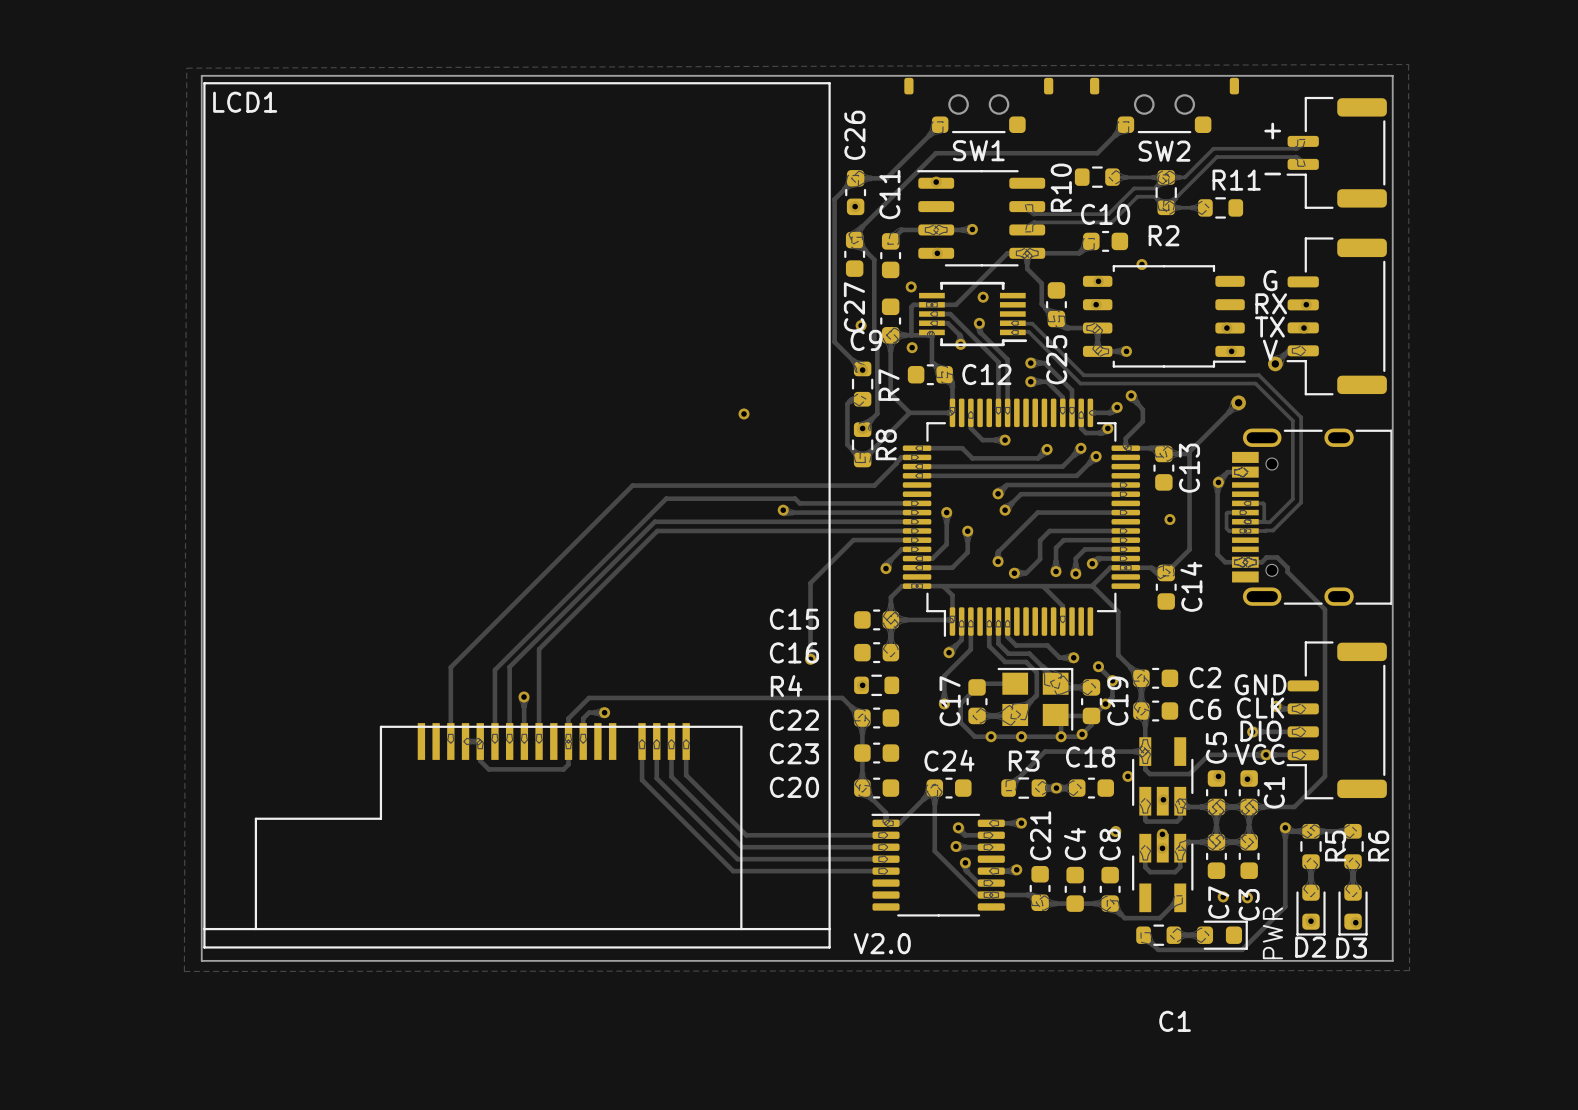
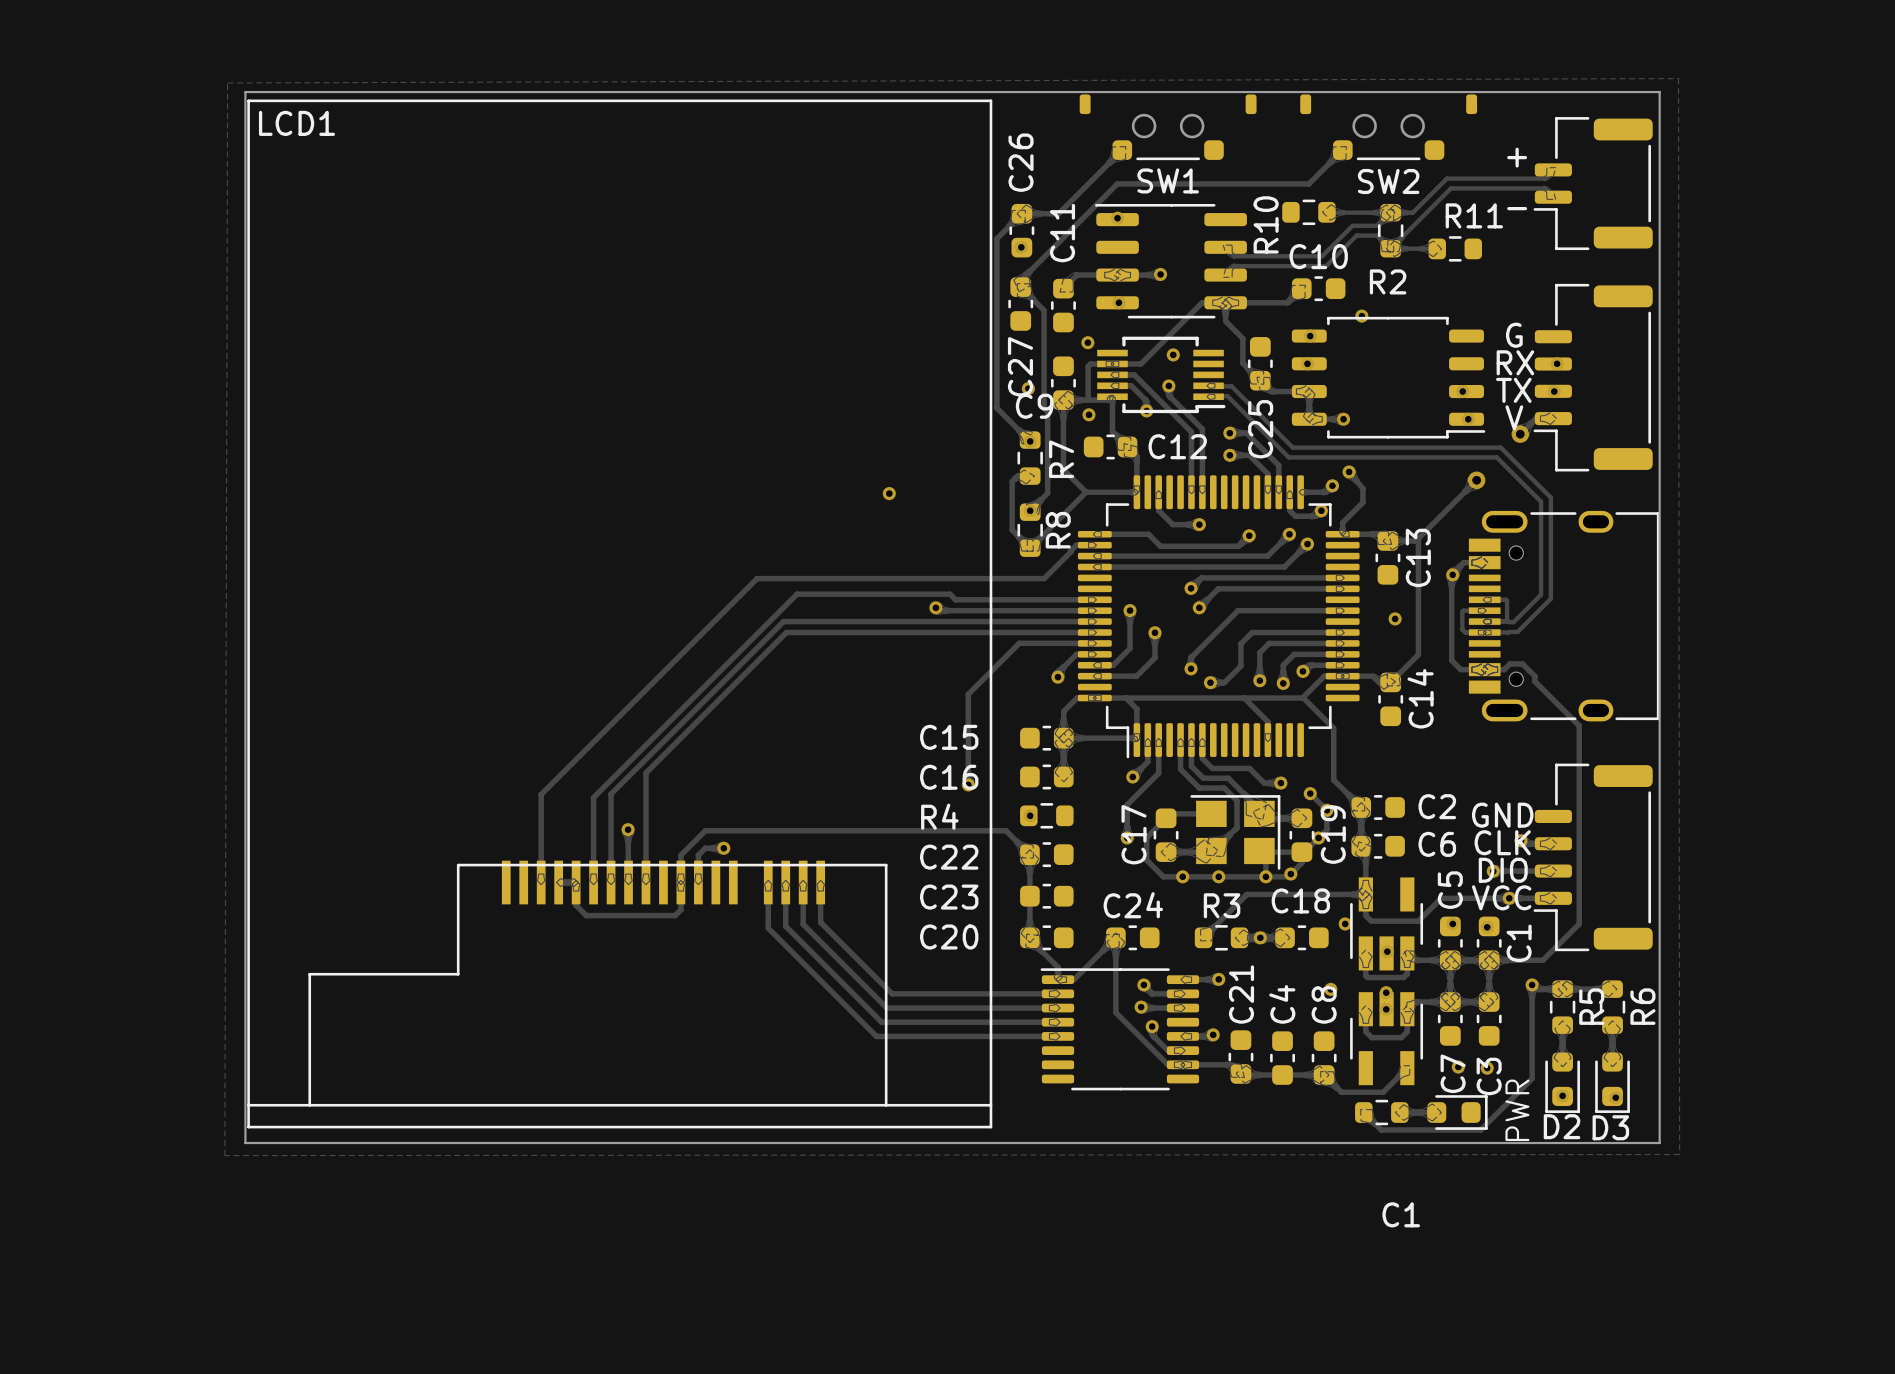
text: V2.0 (882, 943) -> none

